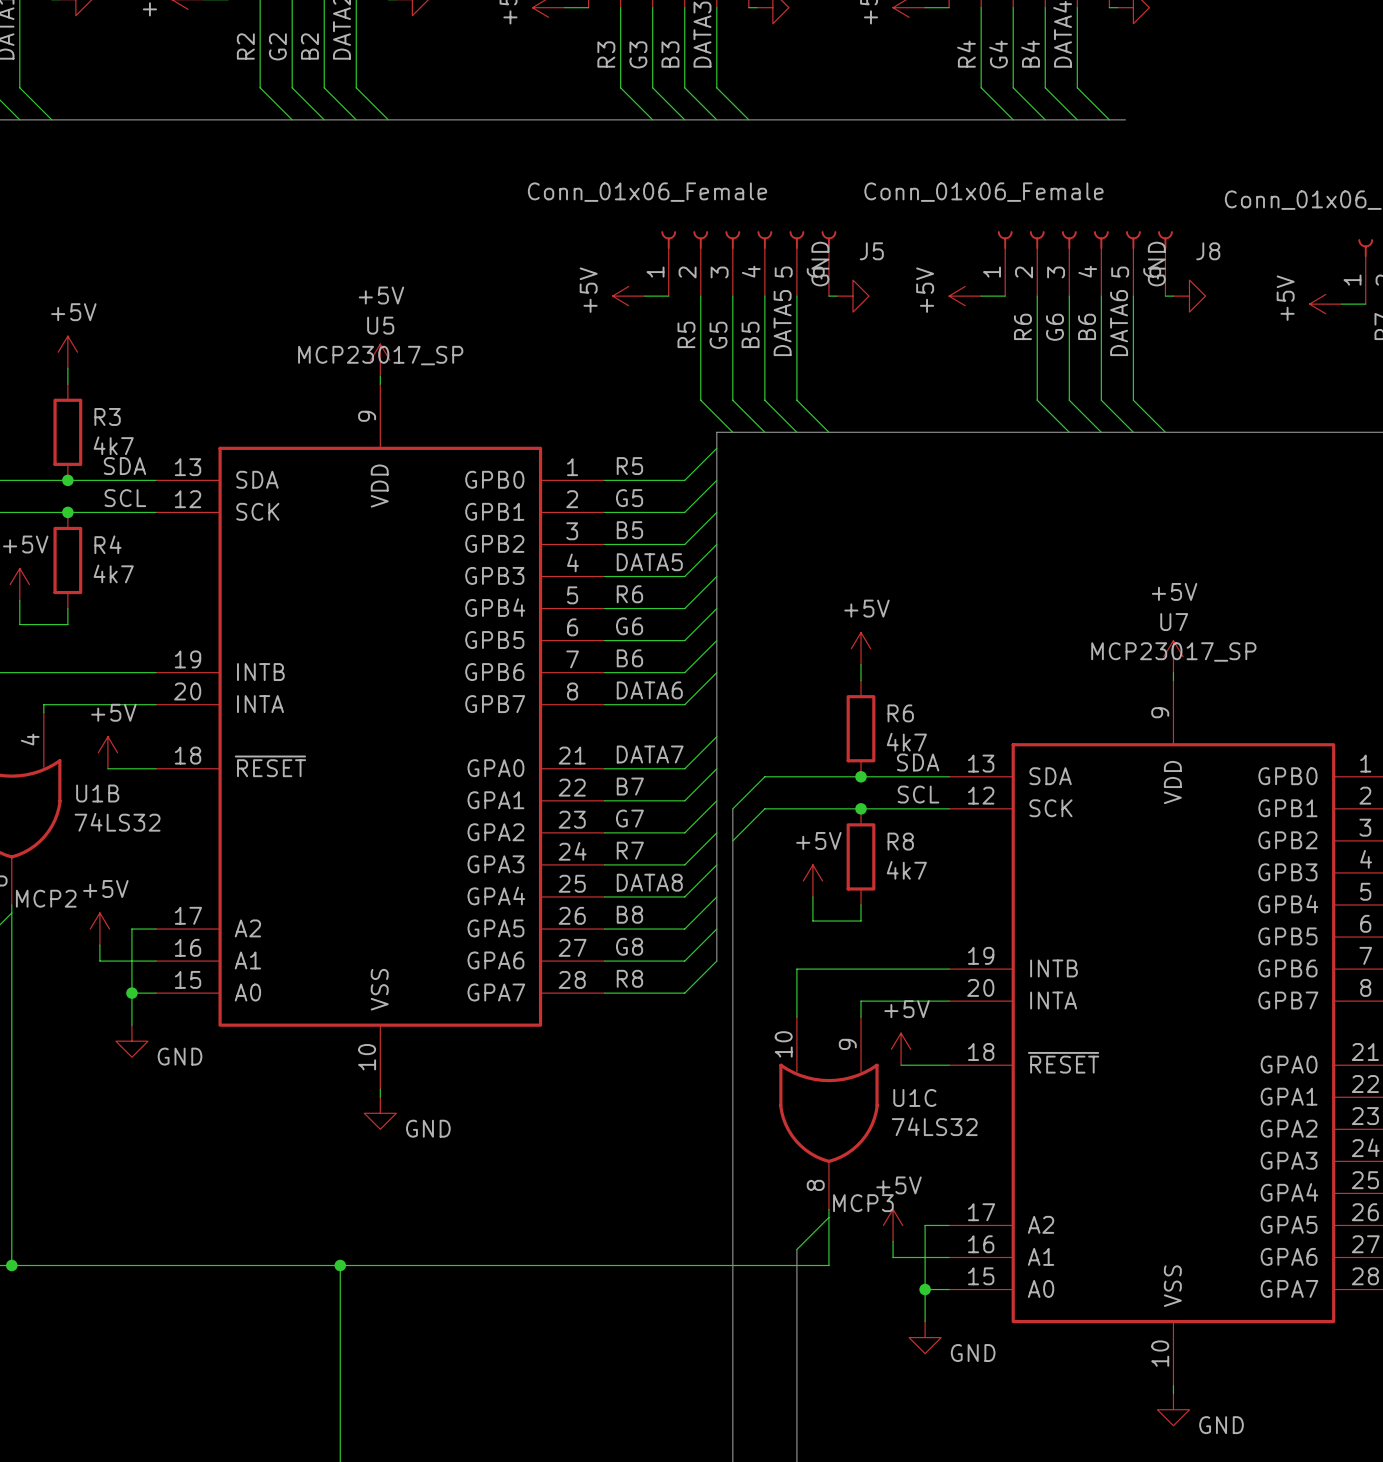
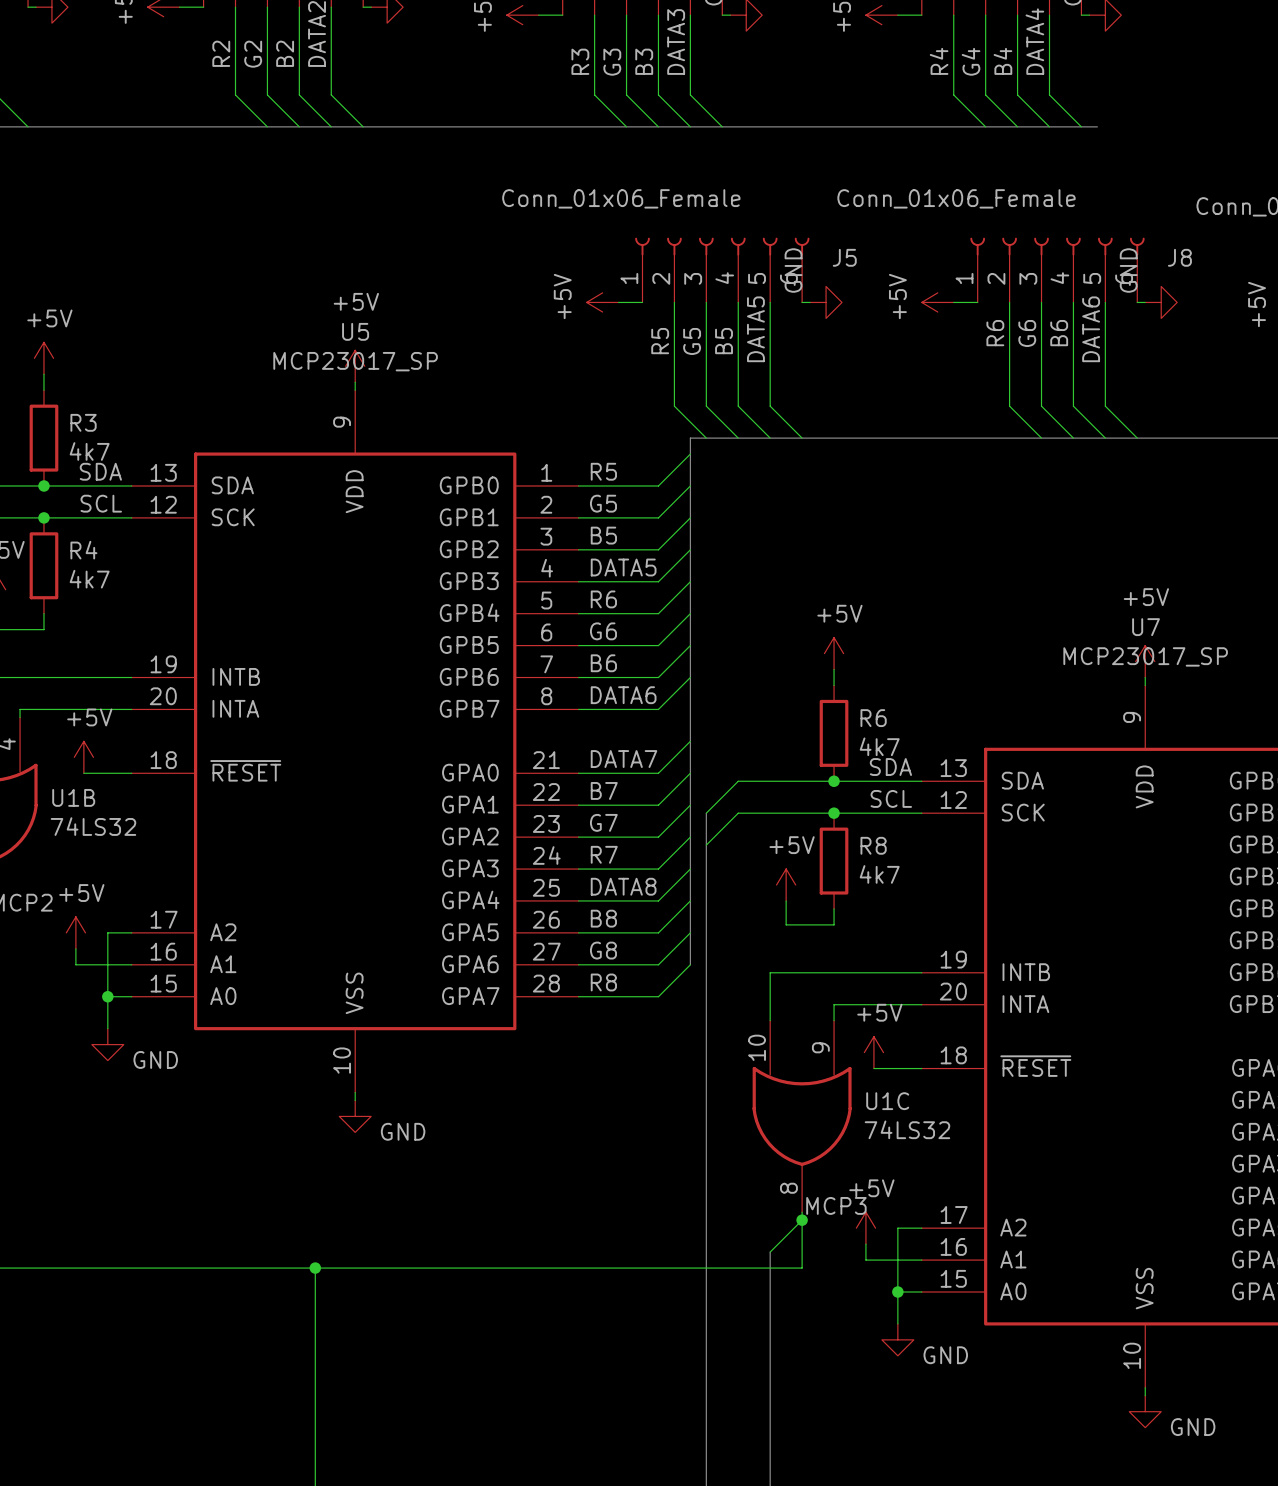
junction: none -> (802, 1220)

